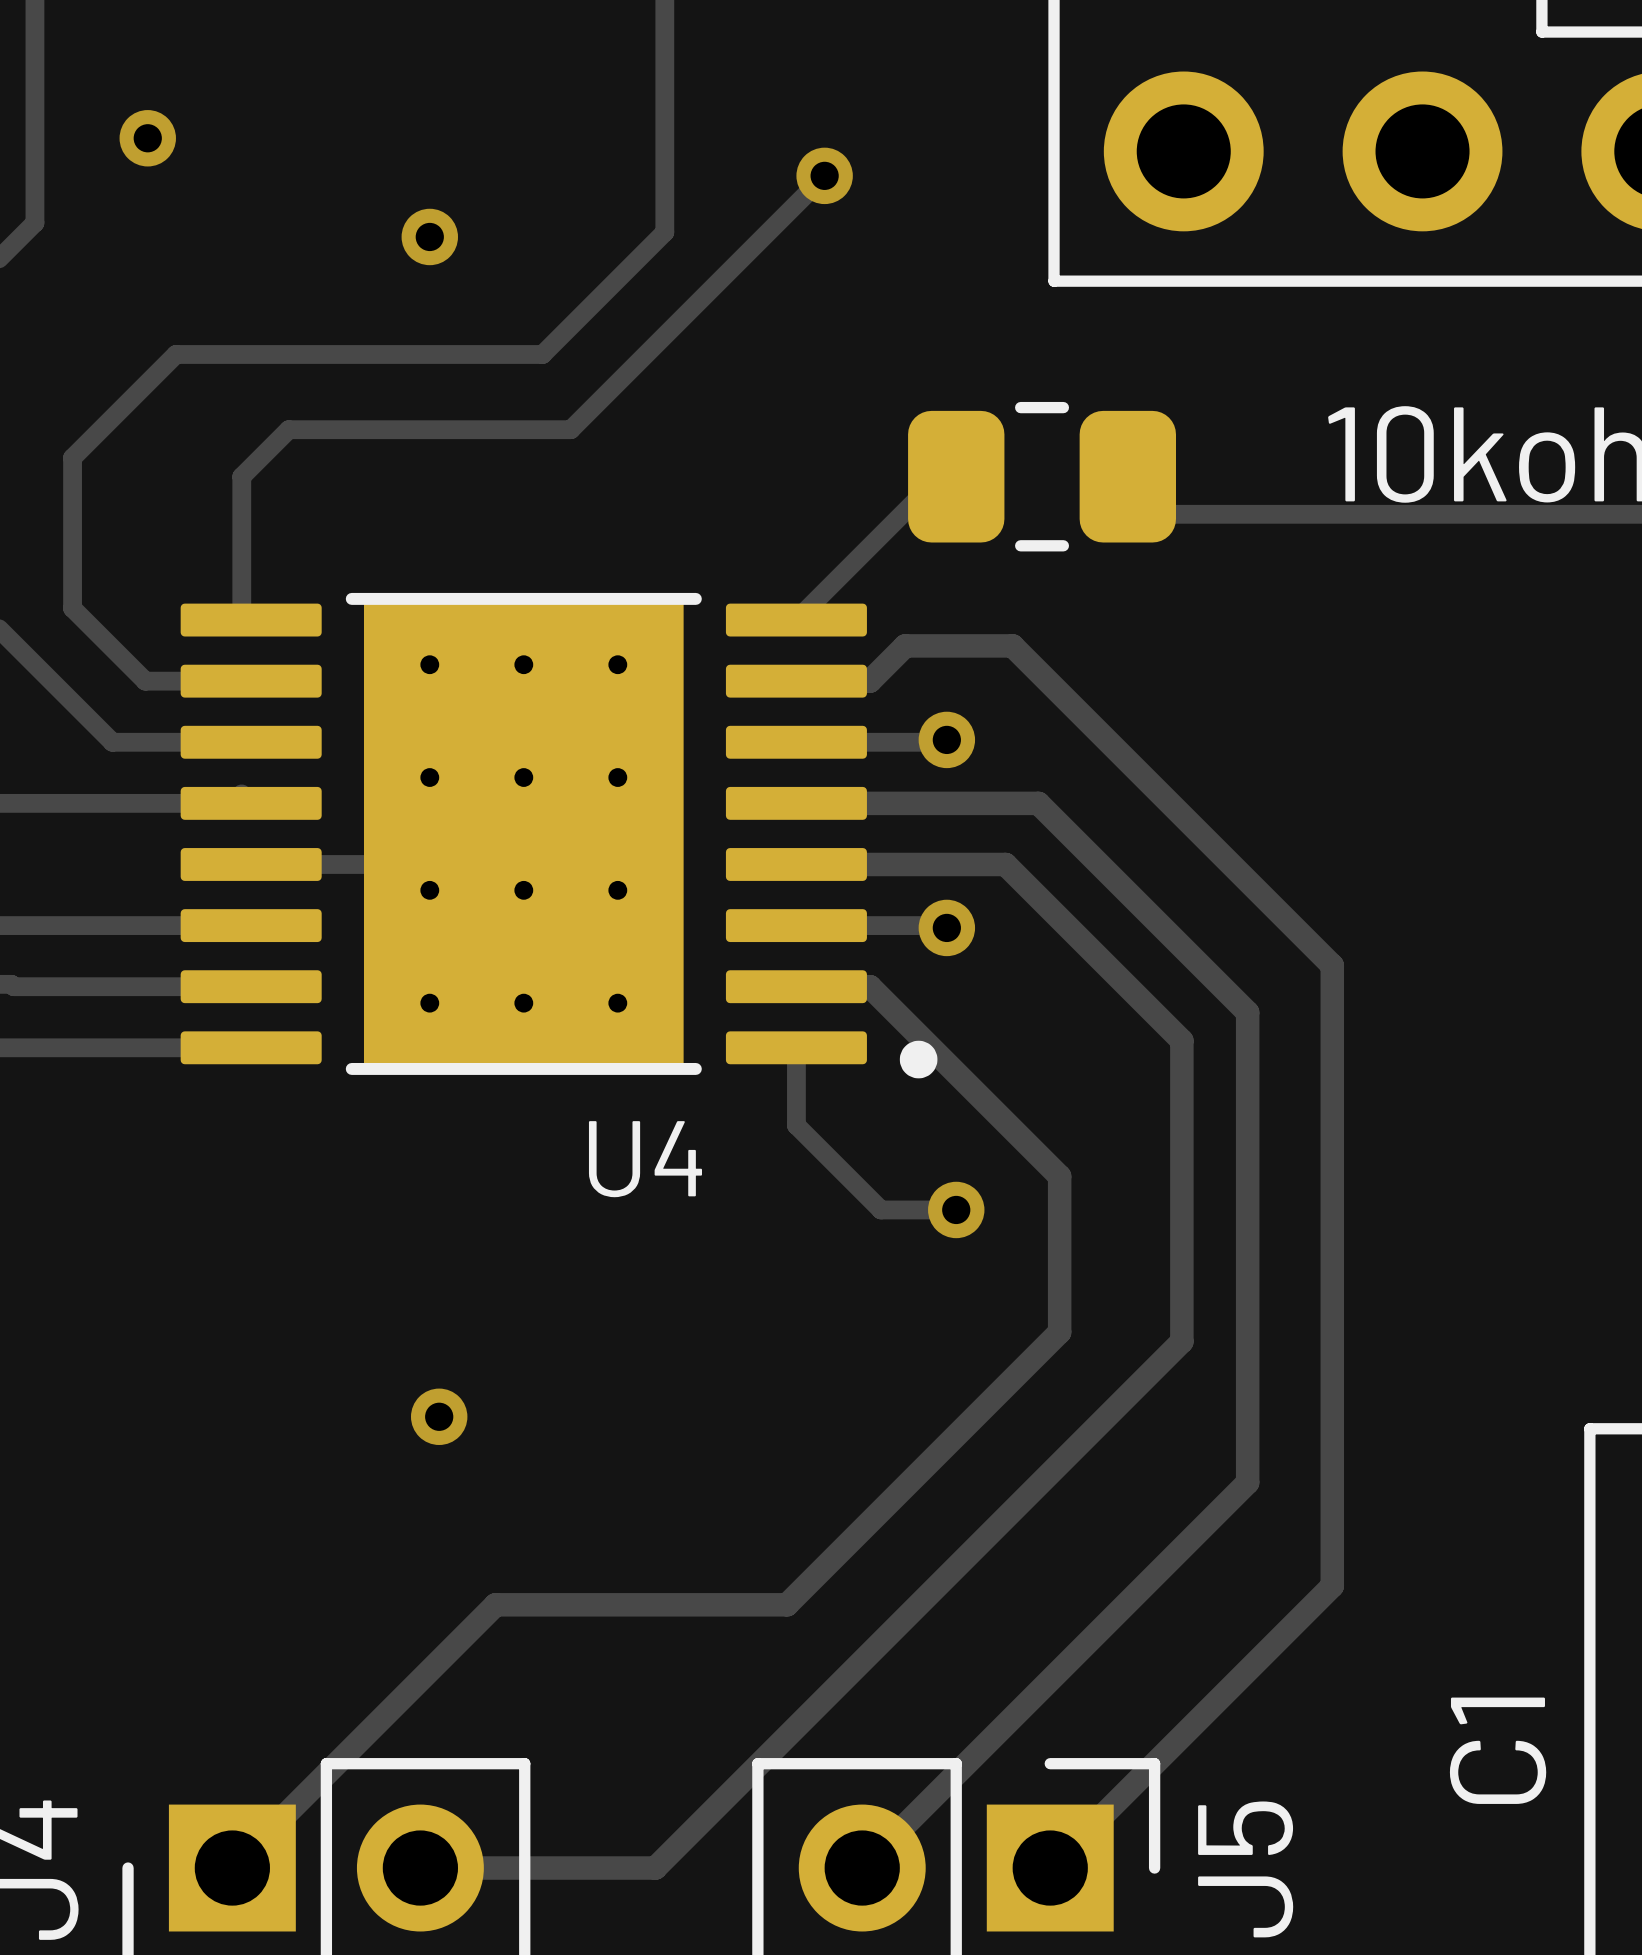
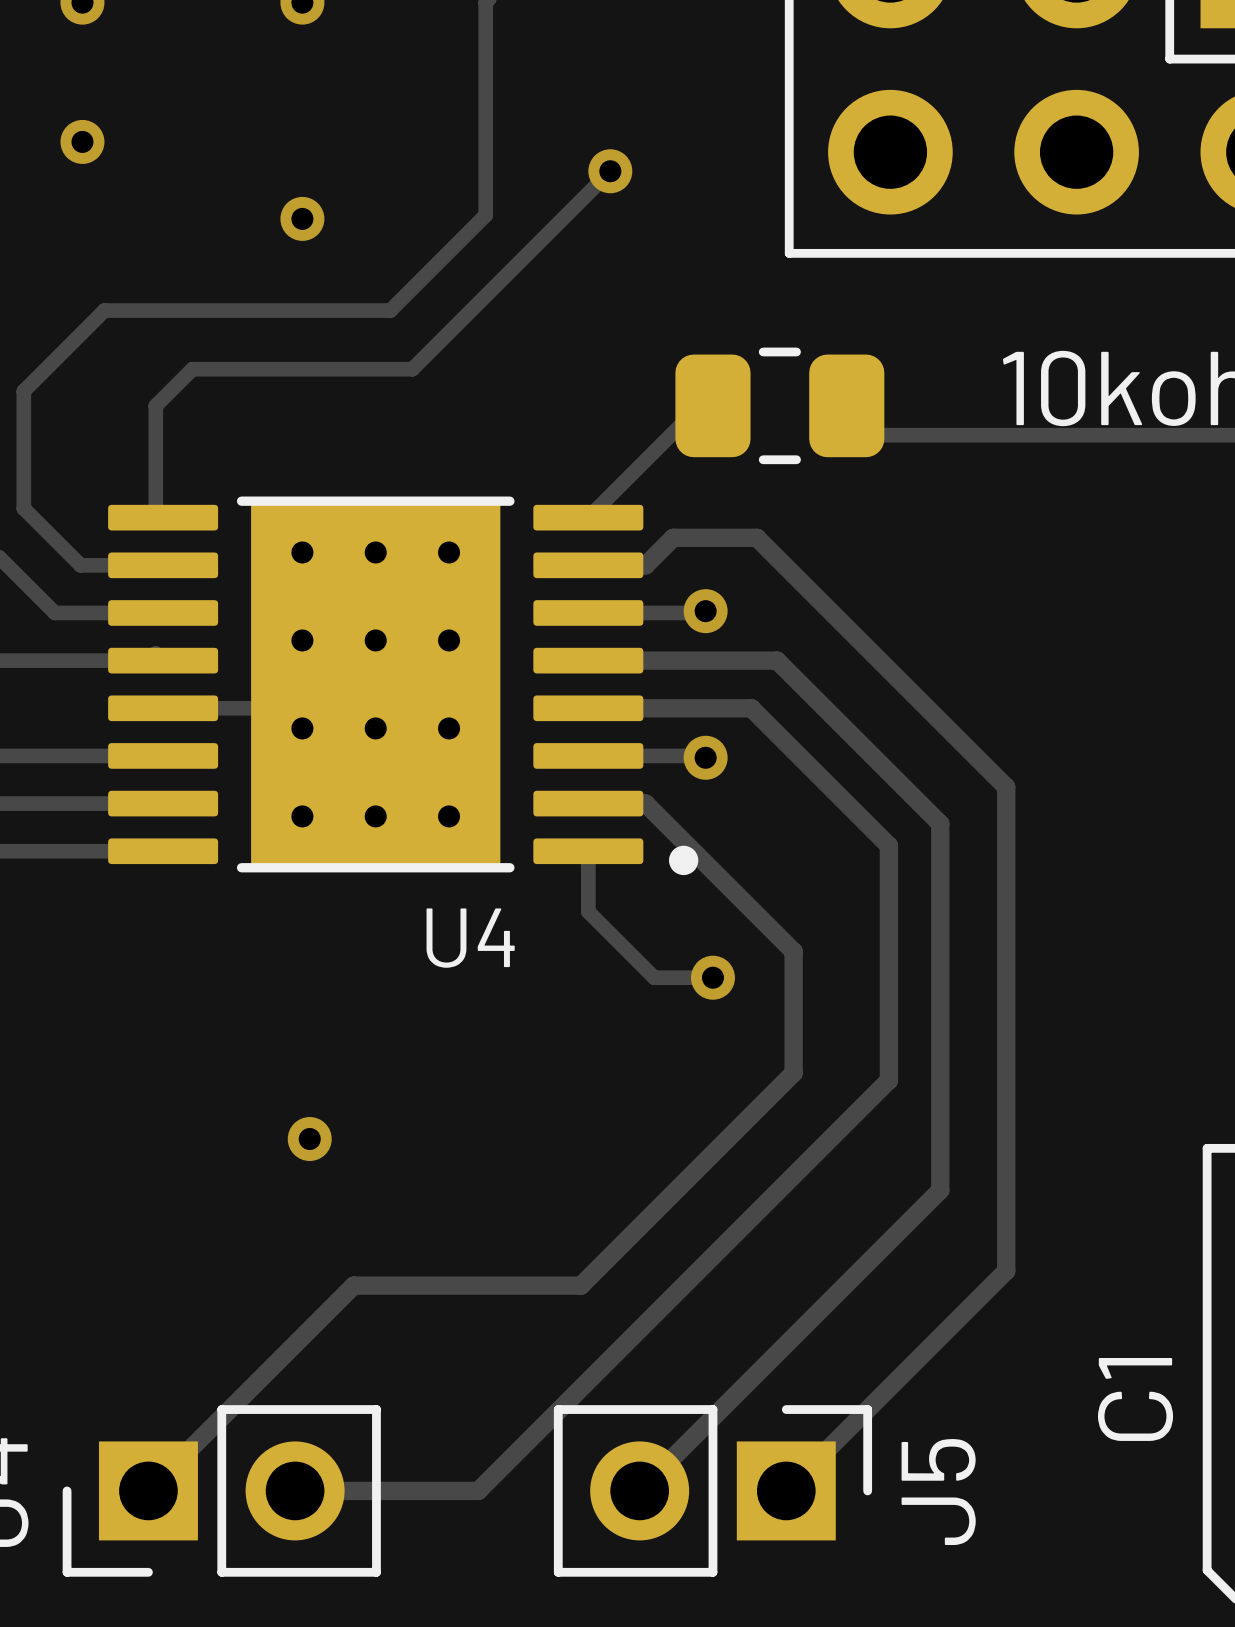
U4 footprint: [180, 592, 938, 1079] -> [108, 496, 699, 876]

